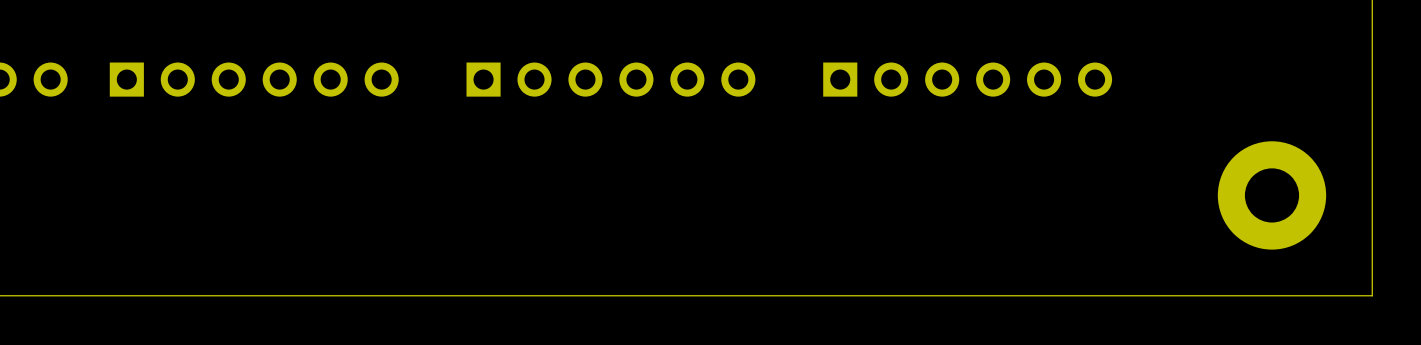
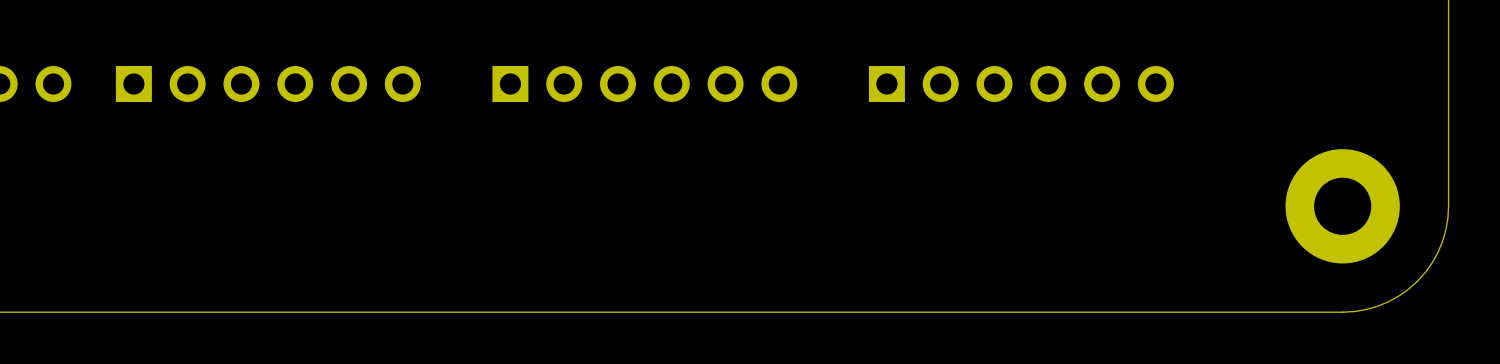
board edge: (1372, 195) (1372, 295) (1271, 295) -> (1448, 206) (1445, 229) (1438, 252) (1417, 281) (1399, 295) (1377, 306) (1342, 312)

